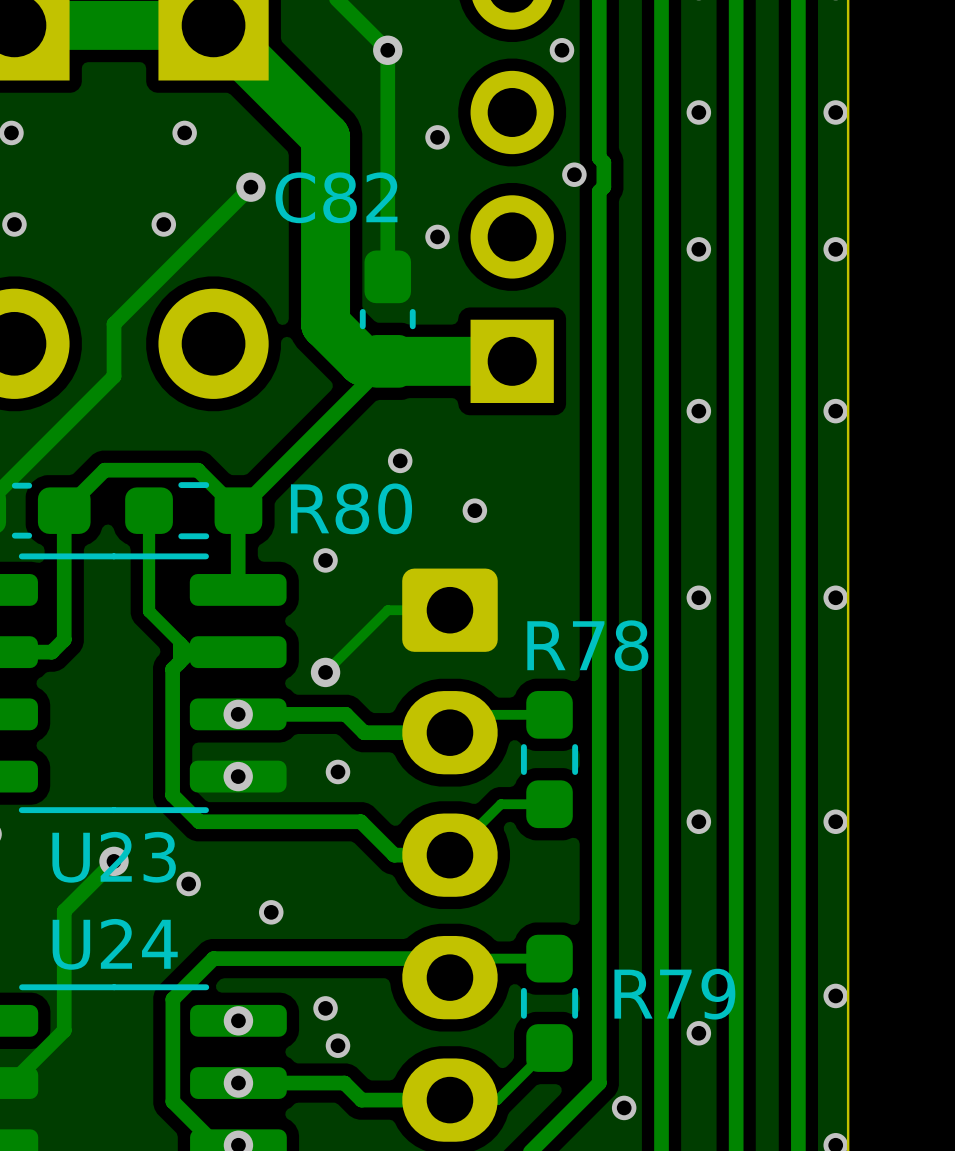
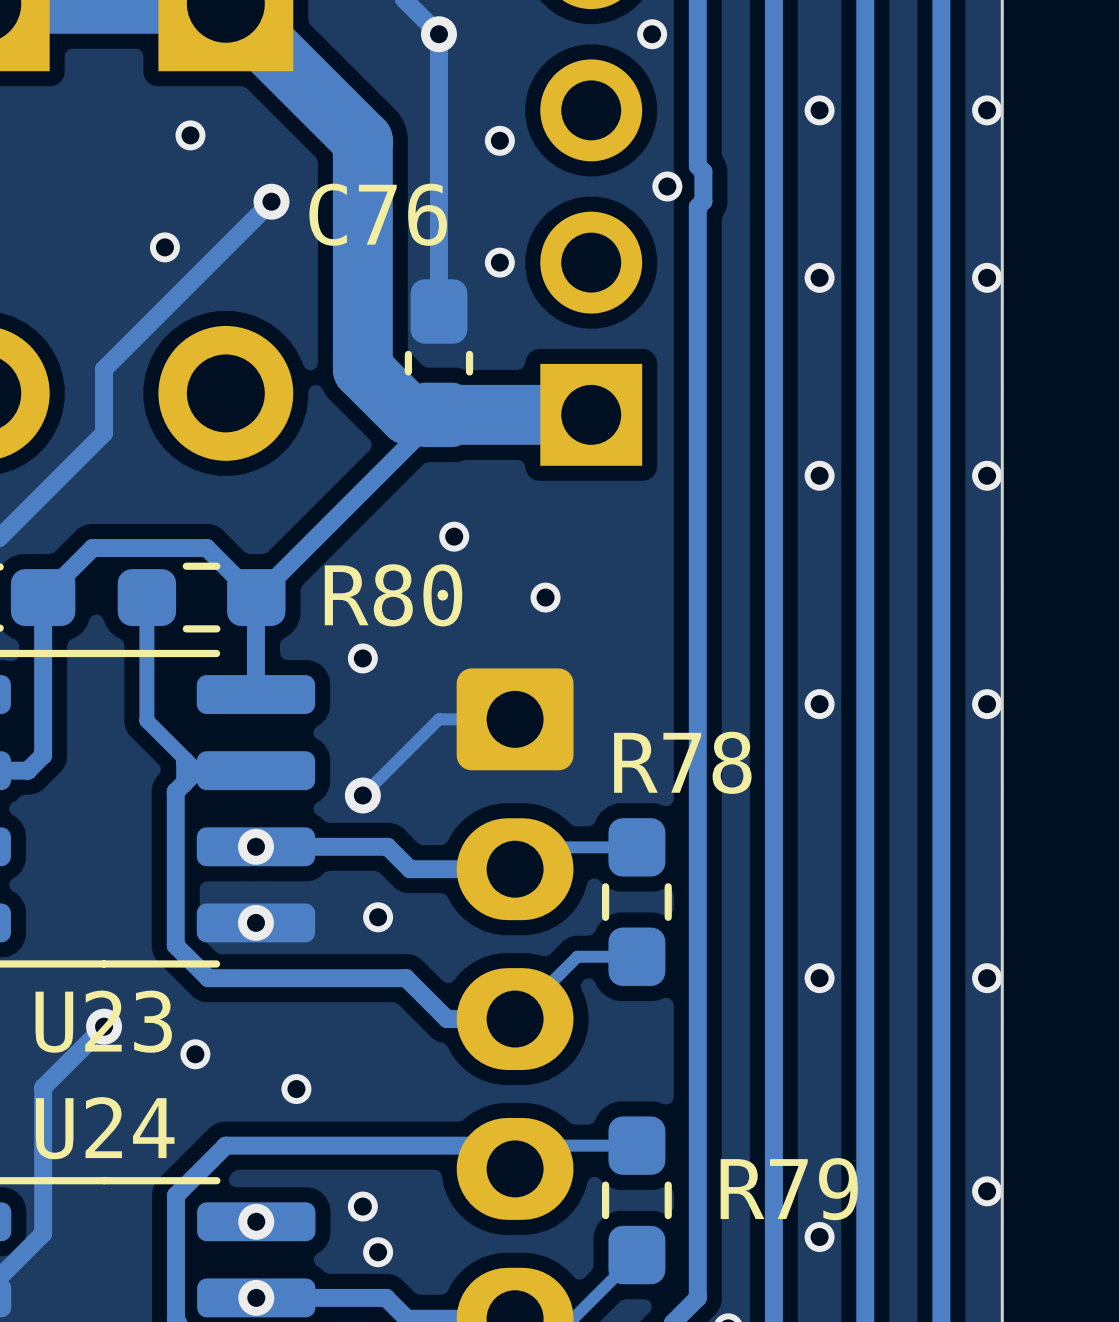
C82 name: C82 (336, 197) -> C76 (378, 214)

